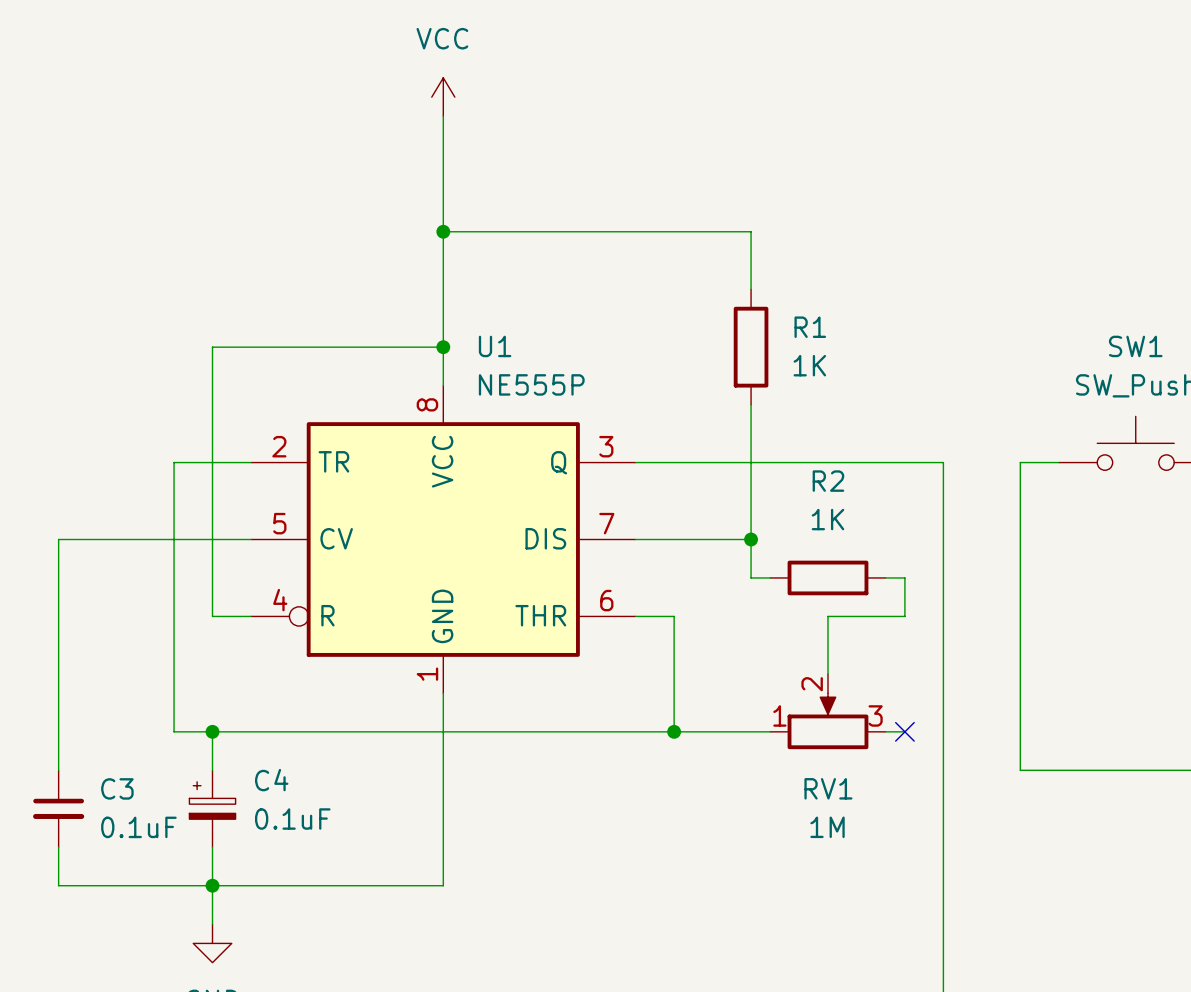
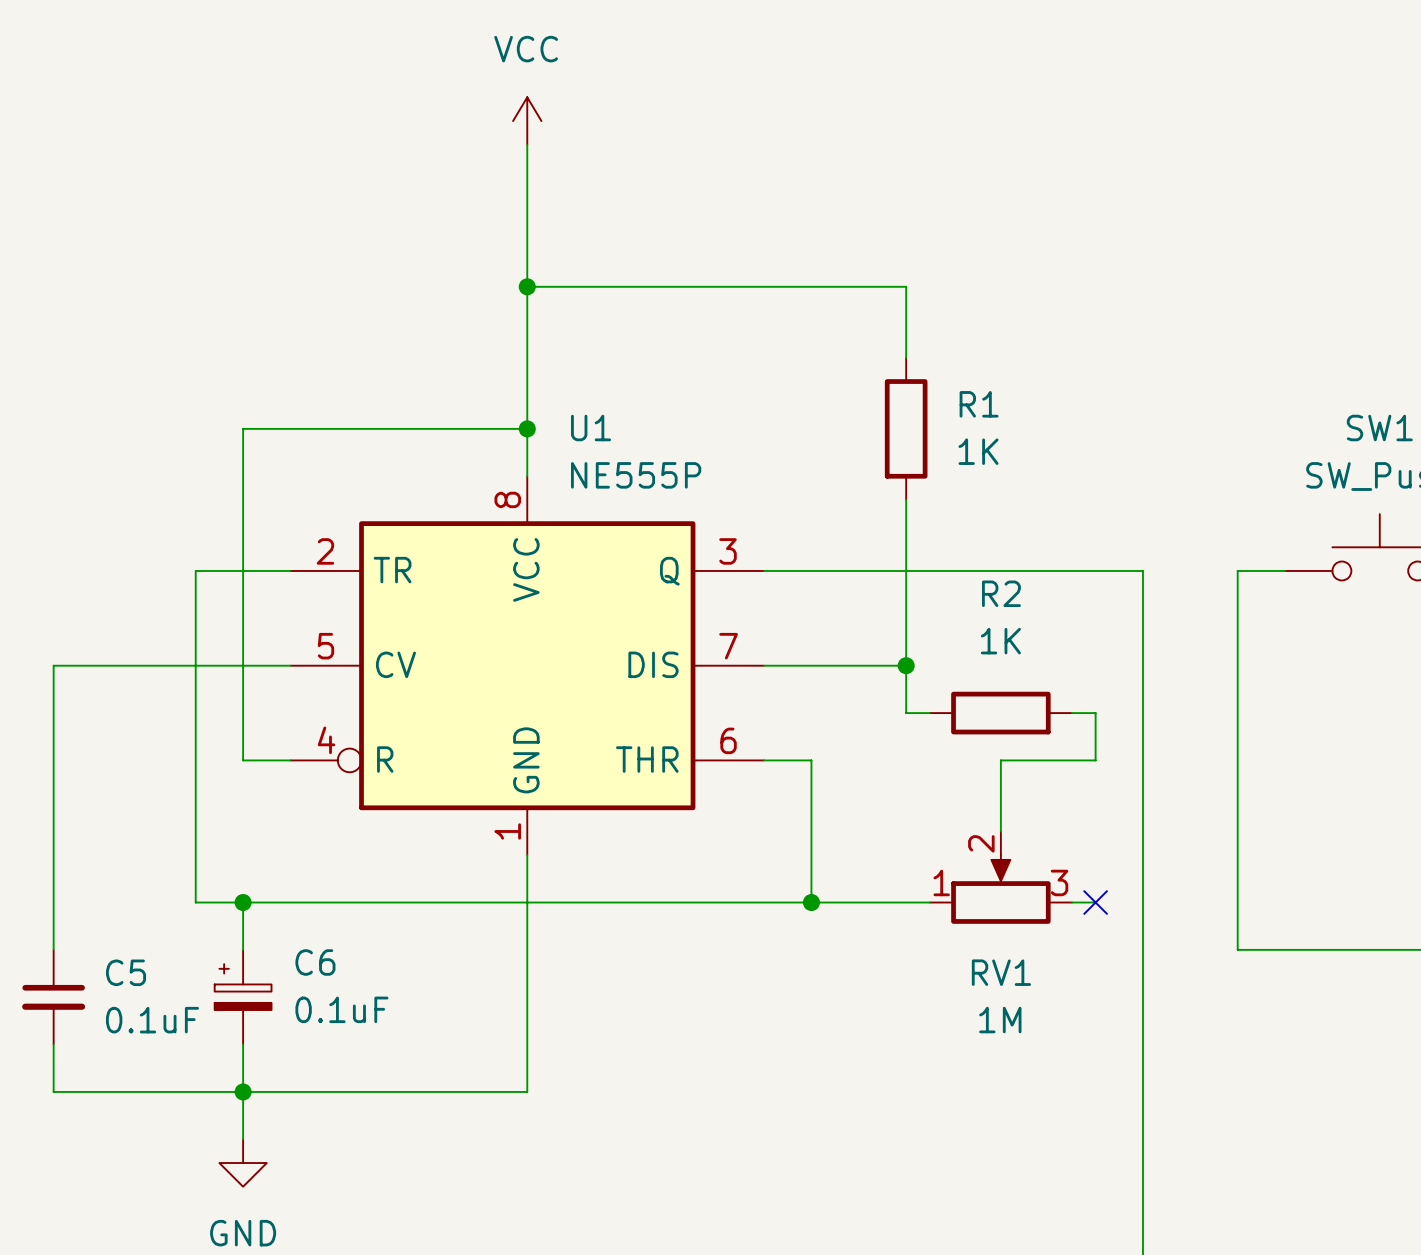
C4 name: C4 (271, 780) -> C6 (315, 962)
C3 name: C3 (117, 788) -> C5 (125, 972)

